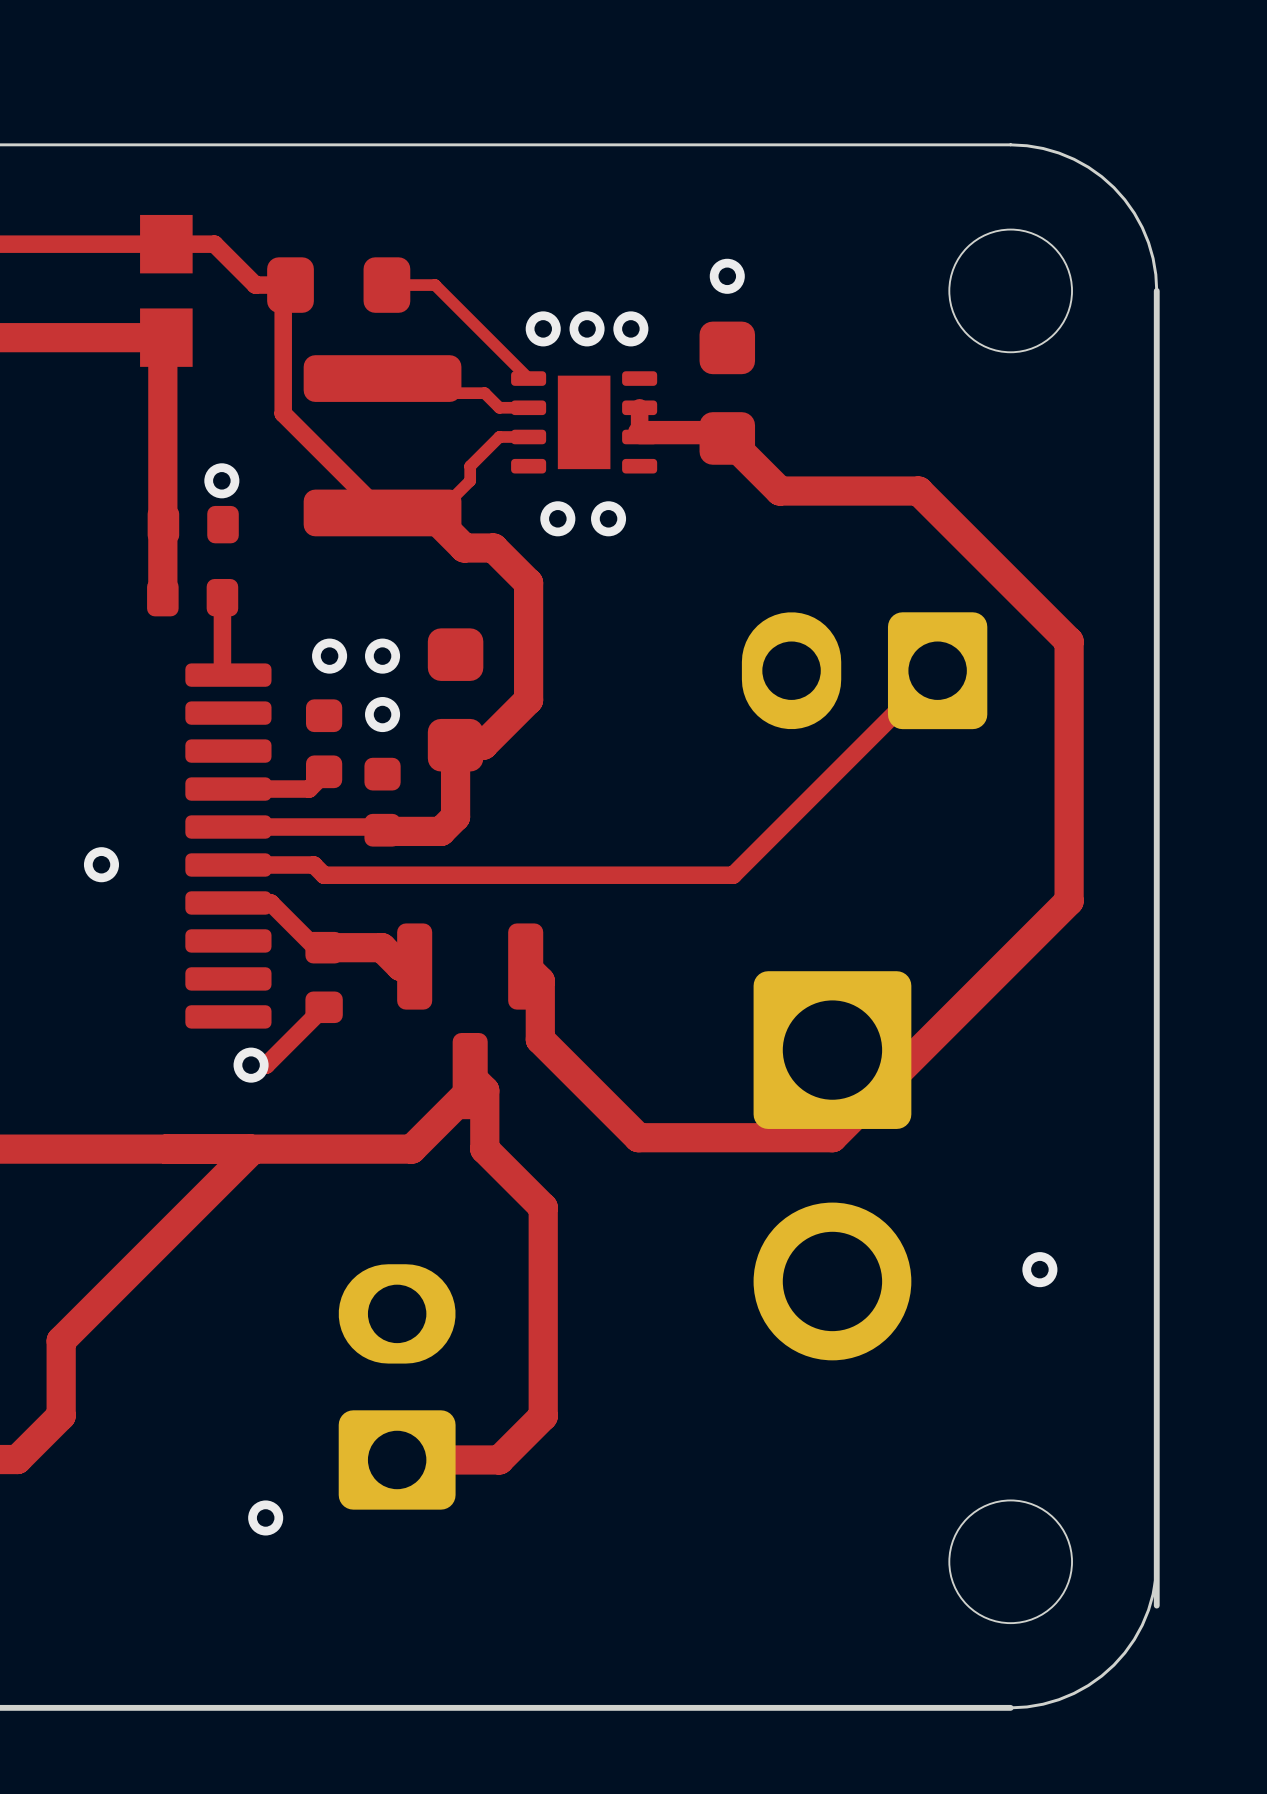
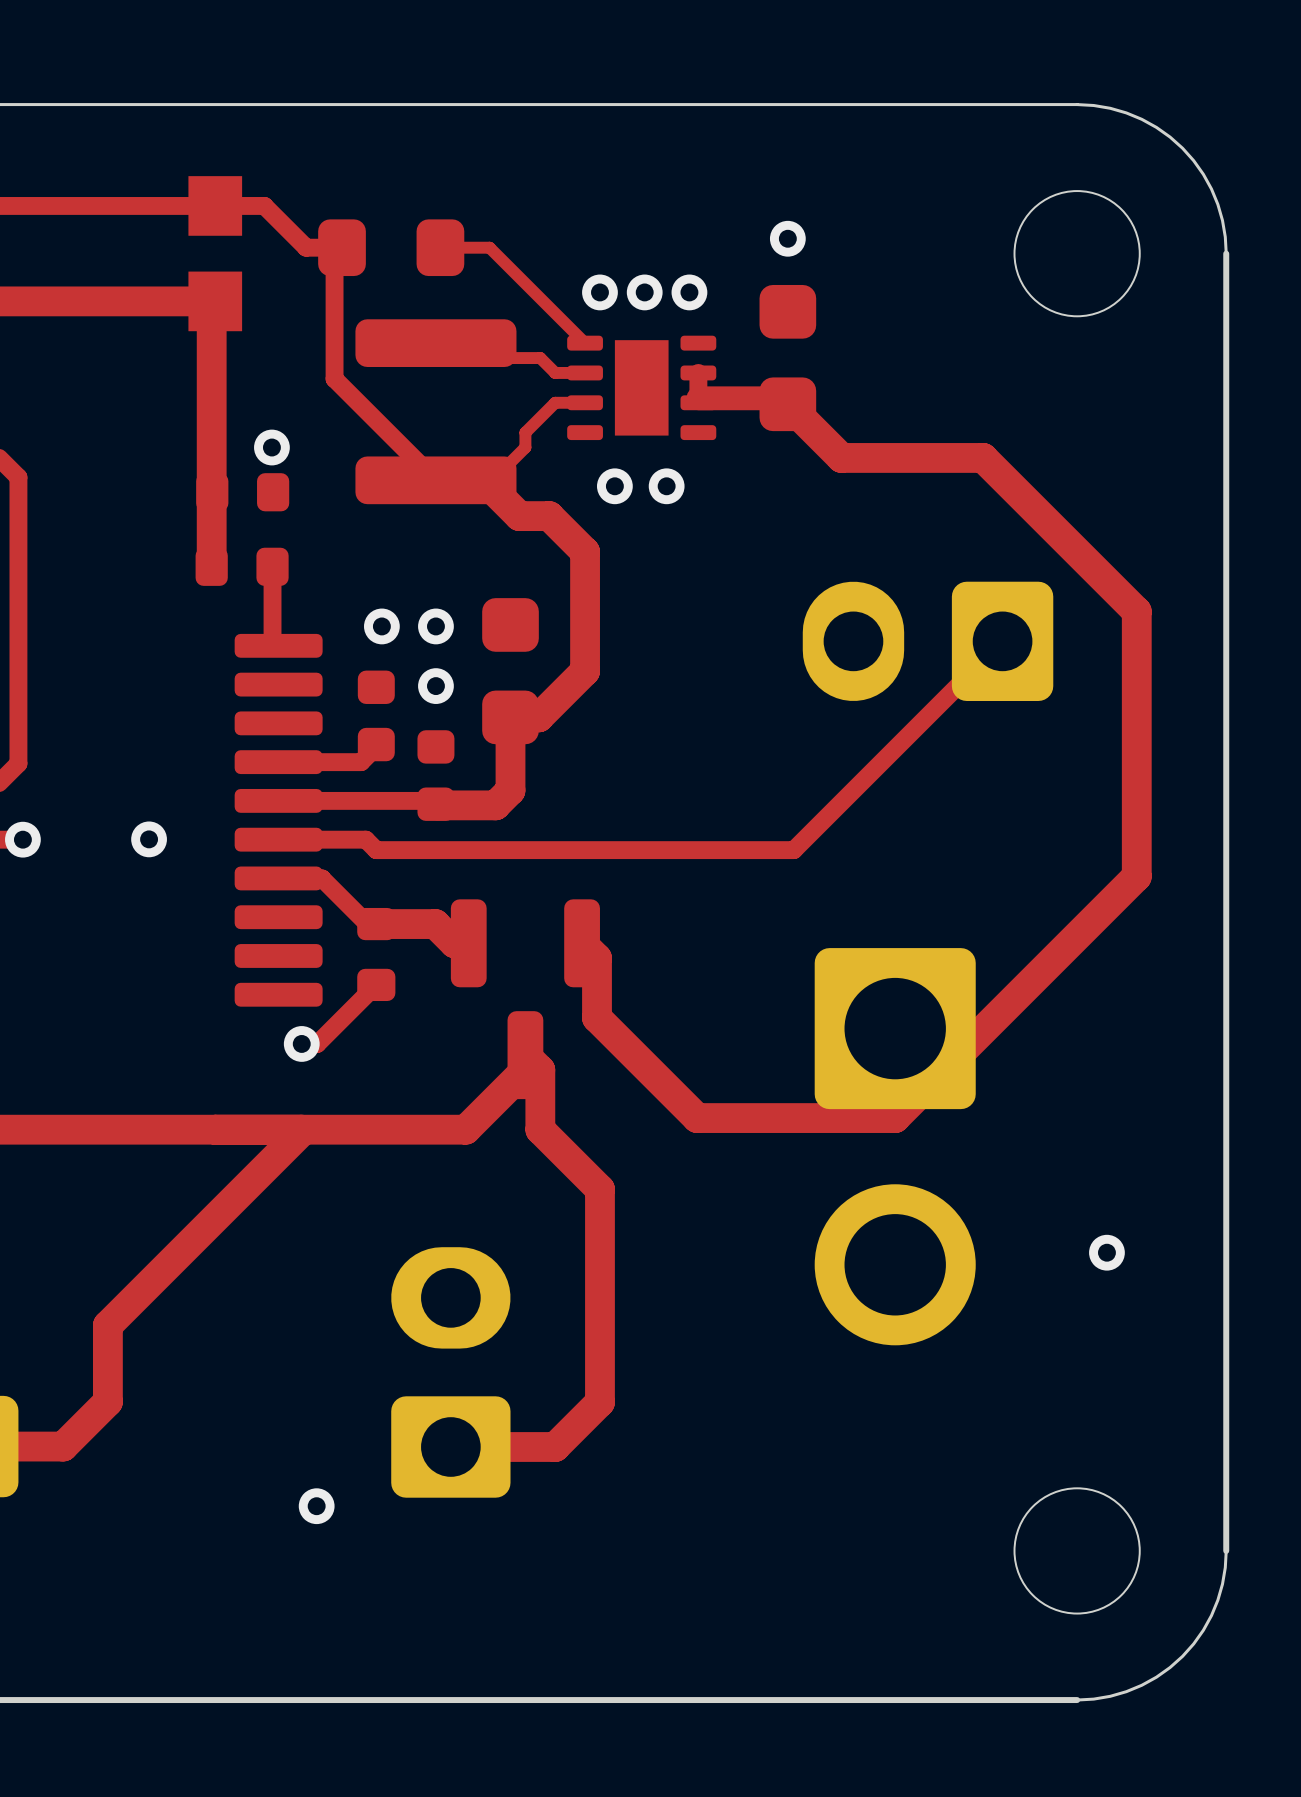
board edge: (1156, 1561) (1156, 1605) -> none

